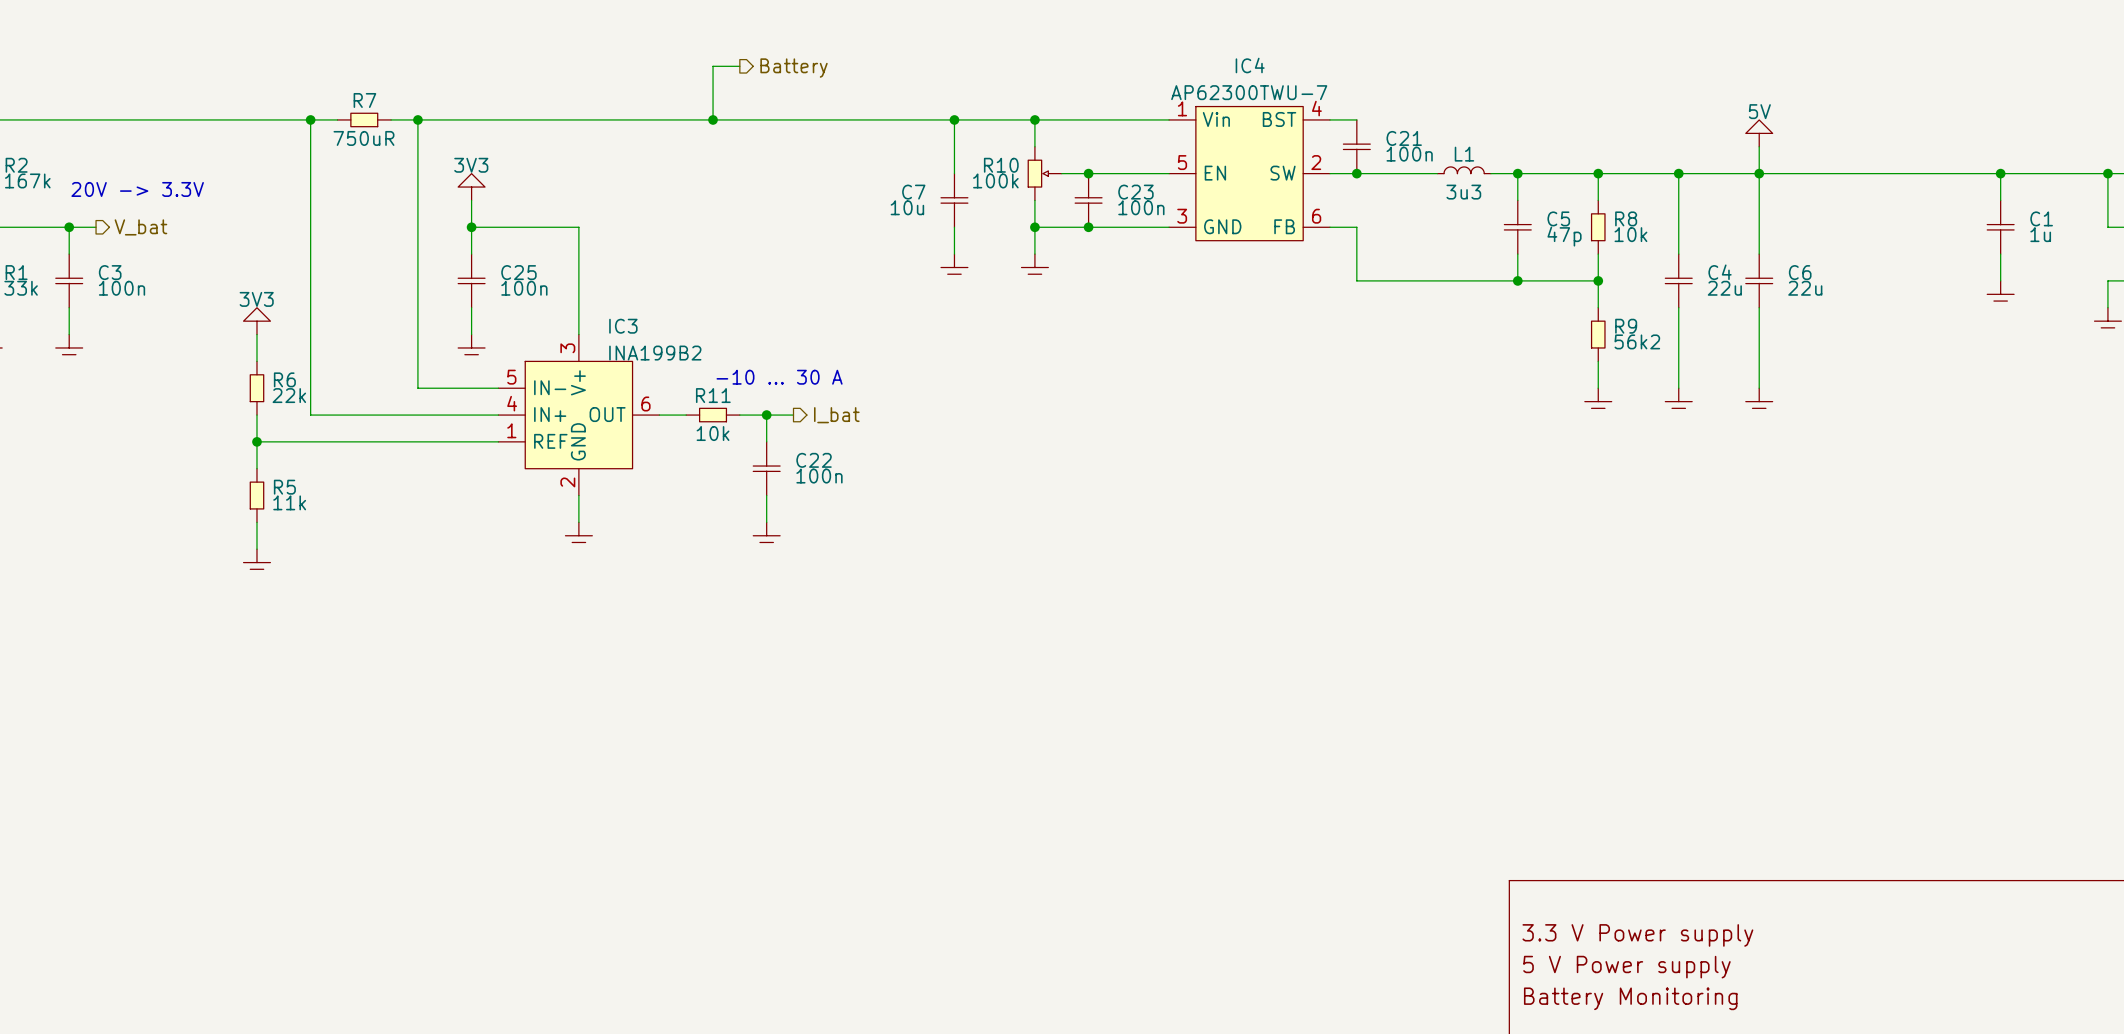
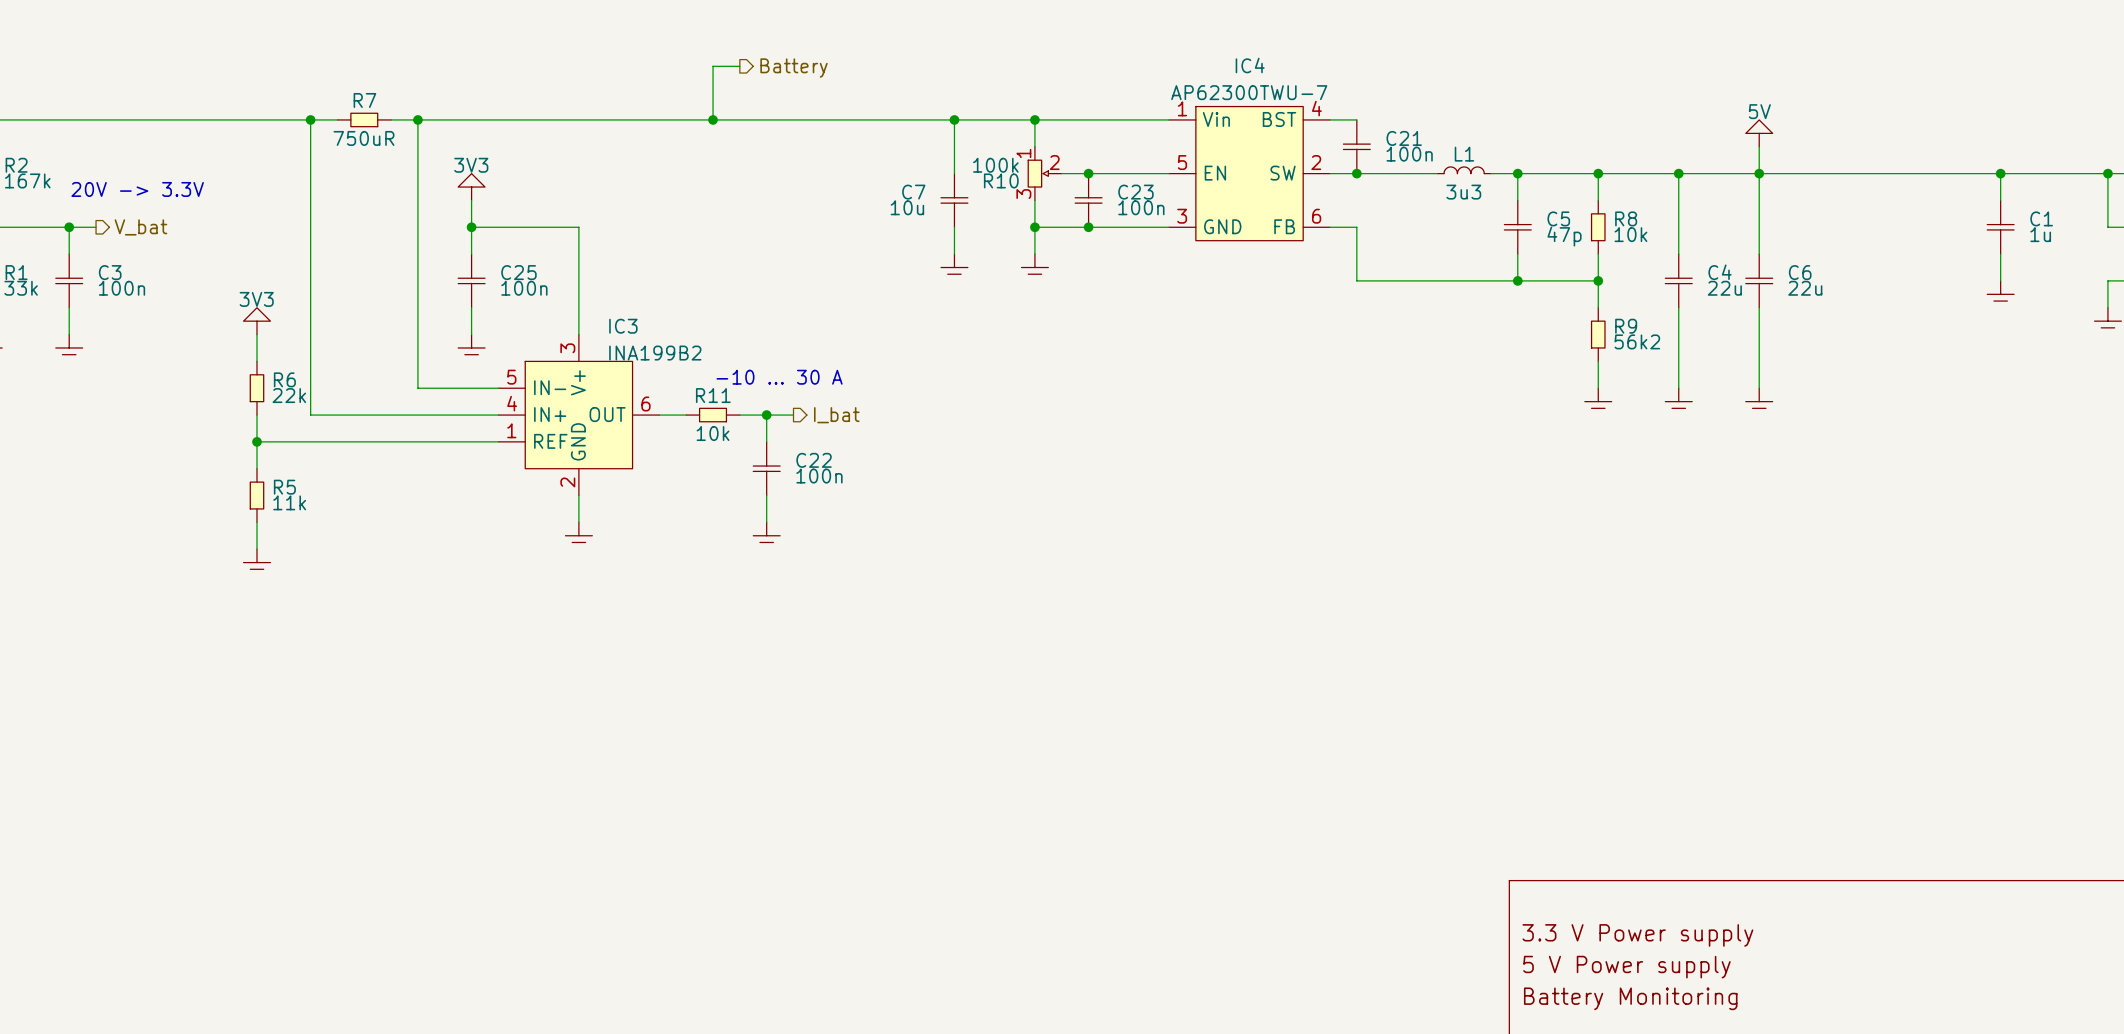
R10 pin number: none -> 1 (1023, 153)
R10 pin number: none -> 2 (1054, 162)
R10 name position: R10 (1001, 165) -> R10 (1001, 180)
R10 value position: 100k (995, 180) -> 100k (995, 165)
R10 pin number: none -> 3 (1023, 194)

